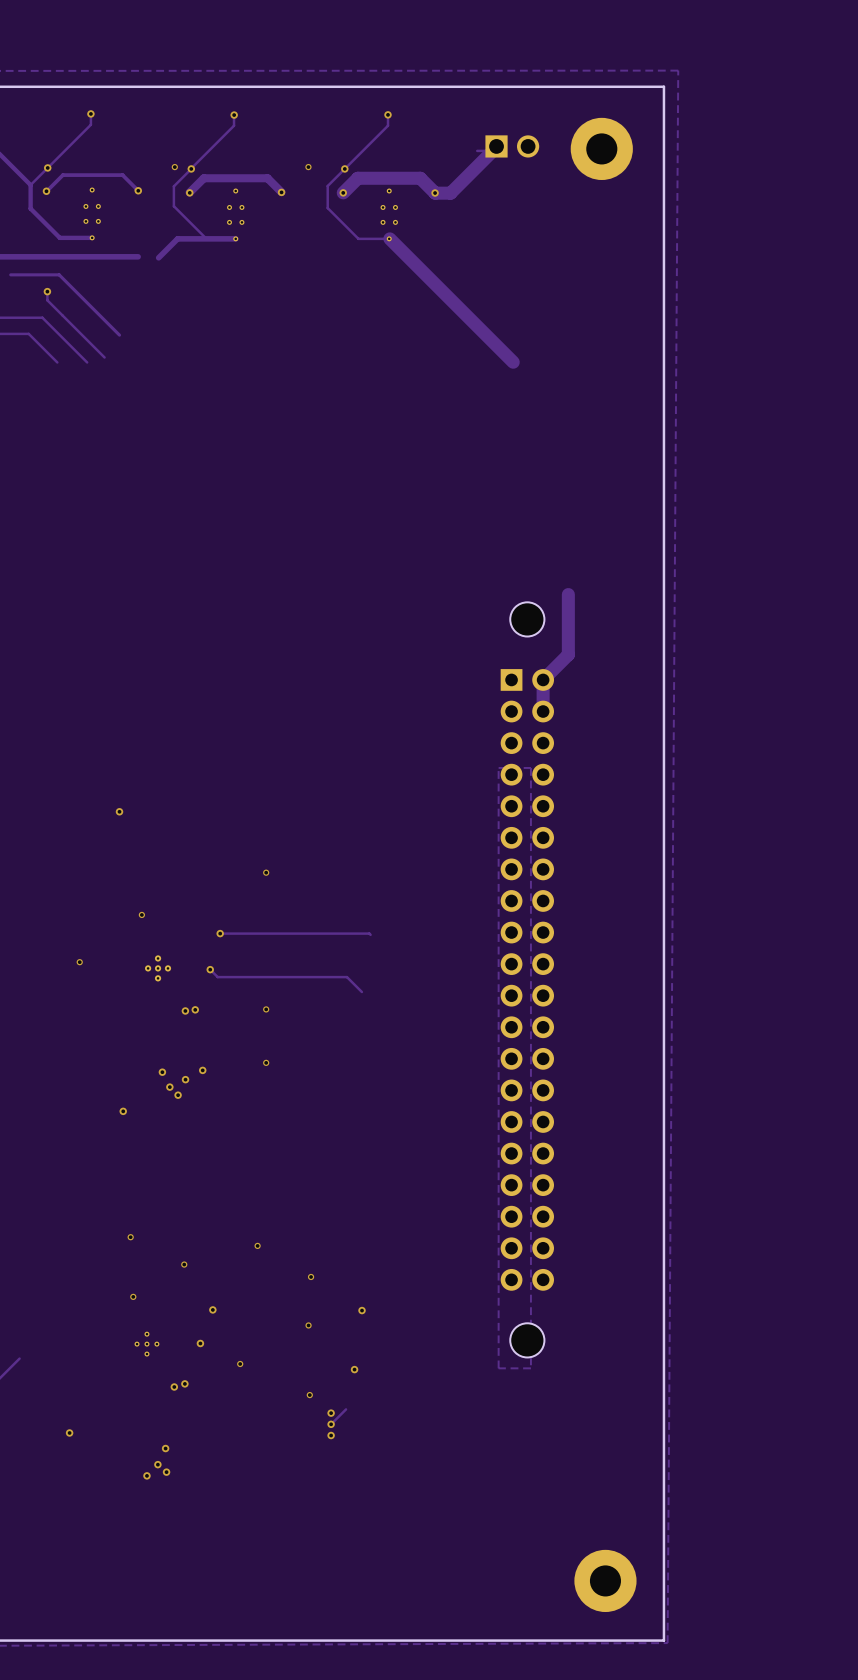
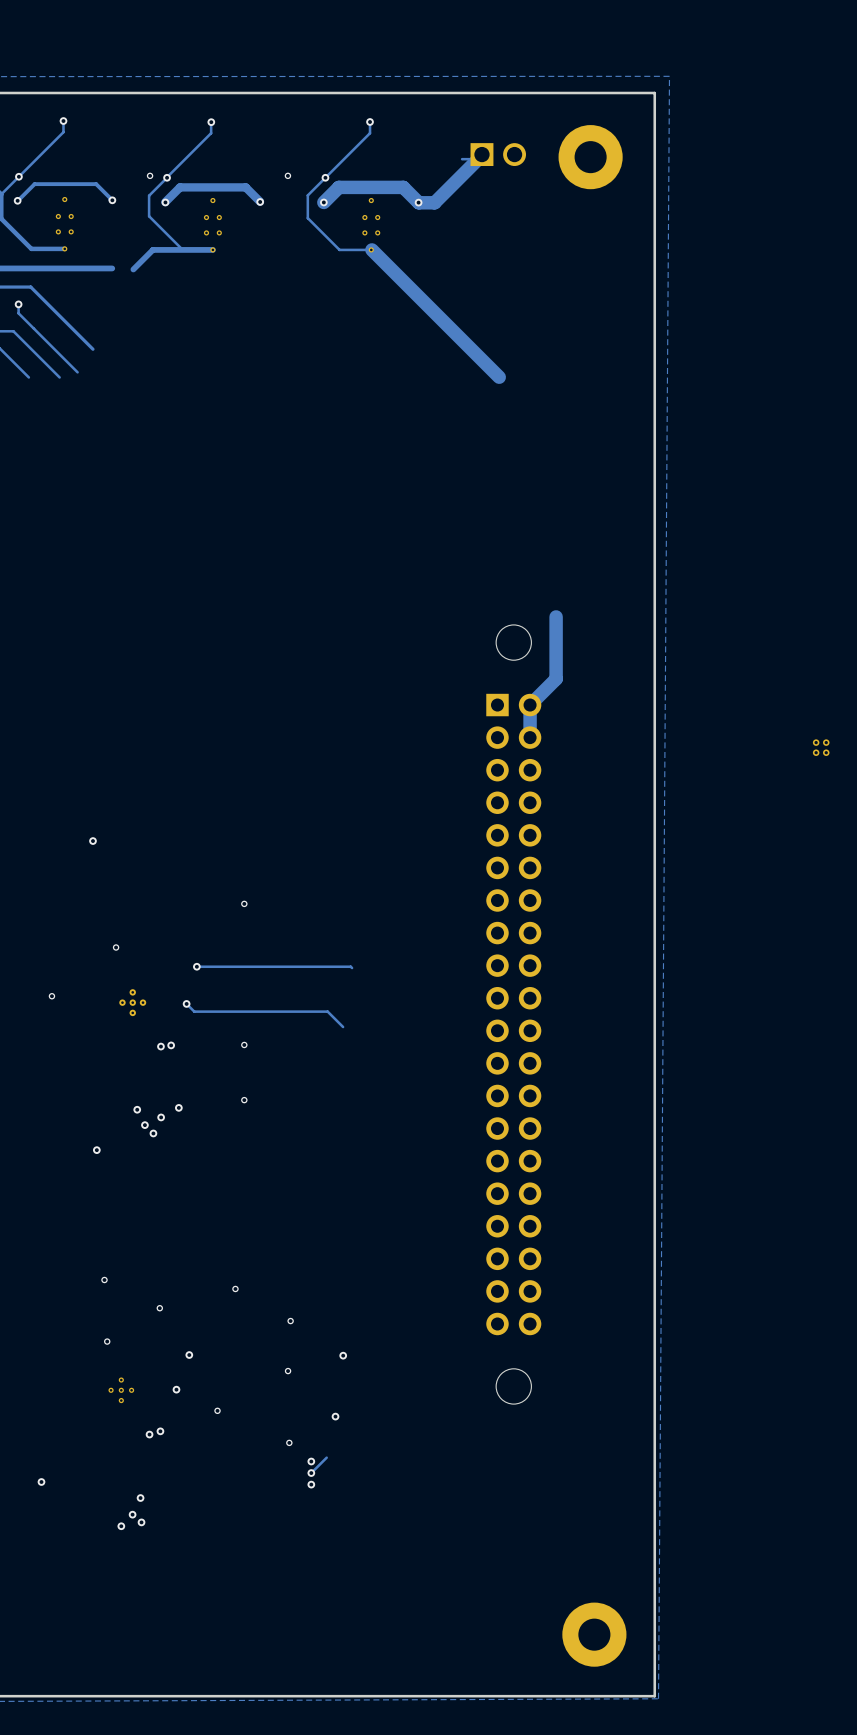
part: none -> (821, 747)
zone outline: (530, 767) (530, 1368) (498, 1368) (498, 767) (530, 767) -> none

